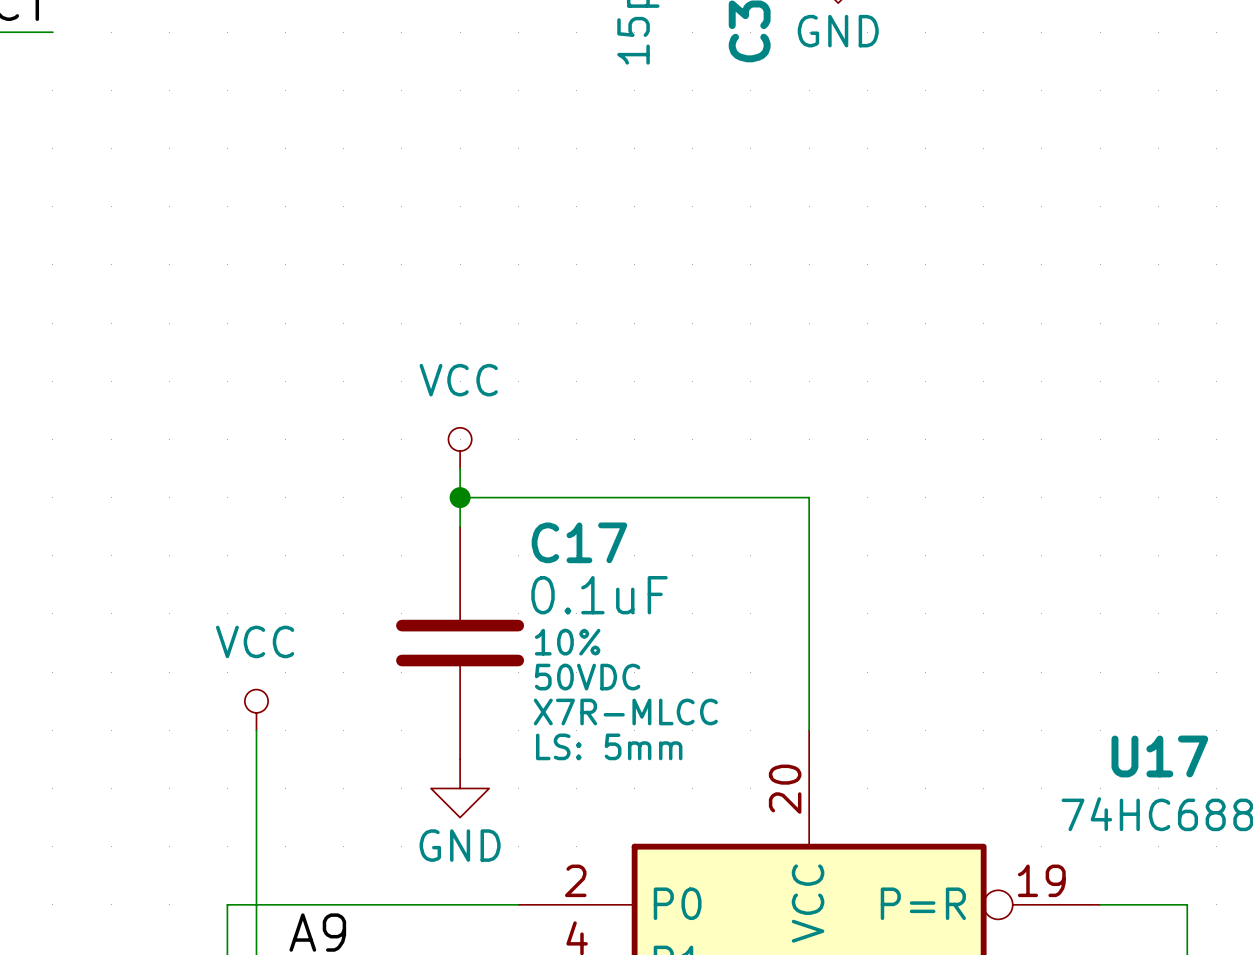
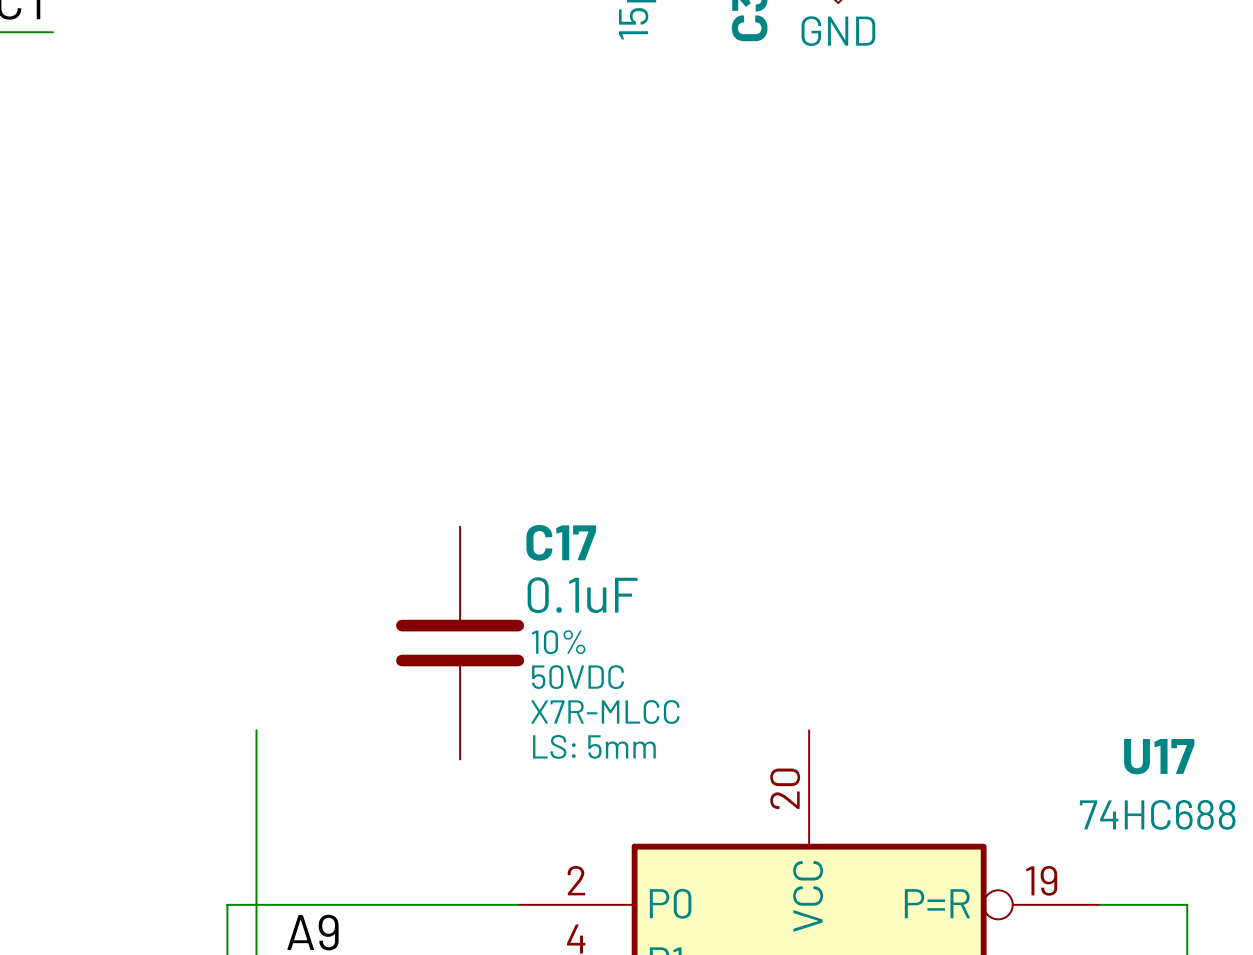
power symbol: VCC (460, 448) -> none
wire: (460, 468) (460, 526) -> none
wire: (460, 497) (809, 497) (809, 730) -> none
junction: (460, 497) -> none
power symbol: VCC (256, 709) -> none
power symbol: GND (460, 788) -> none

